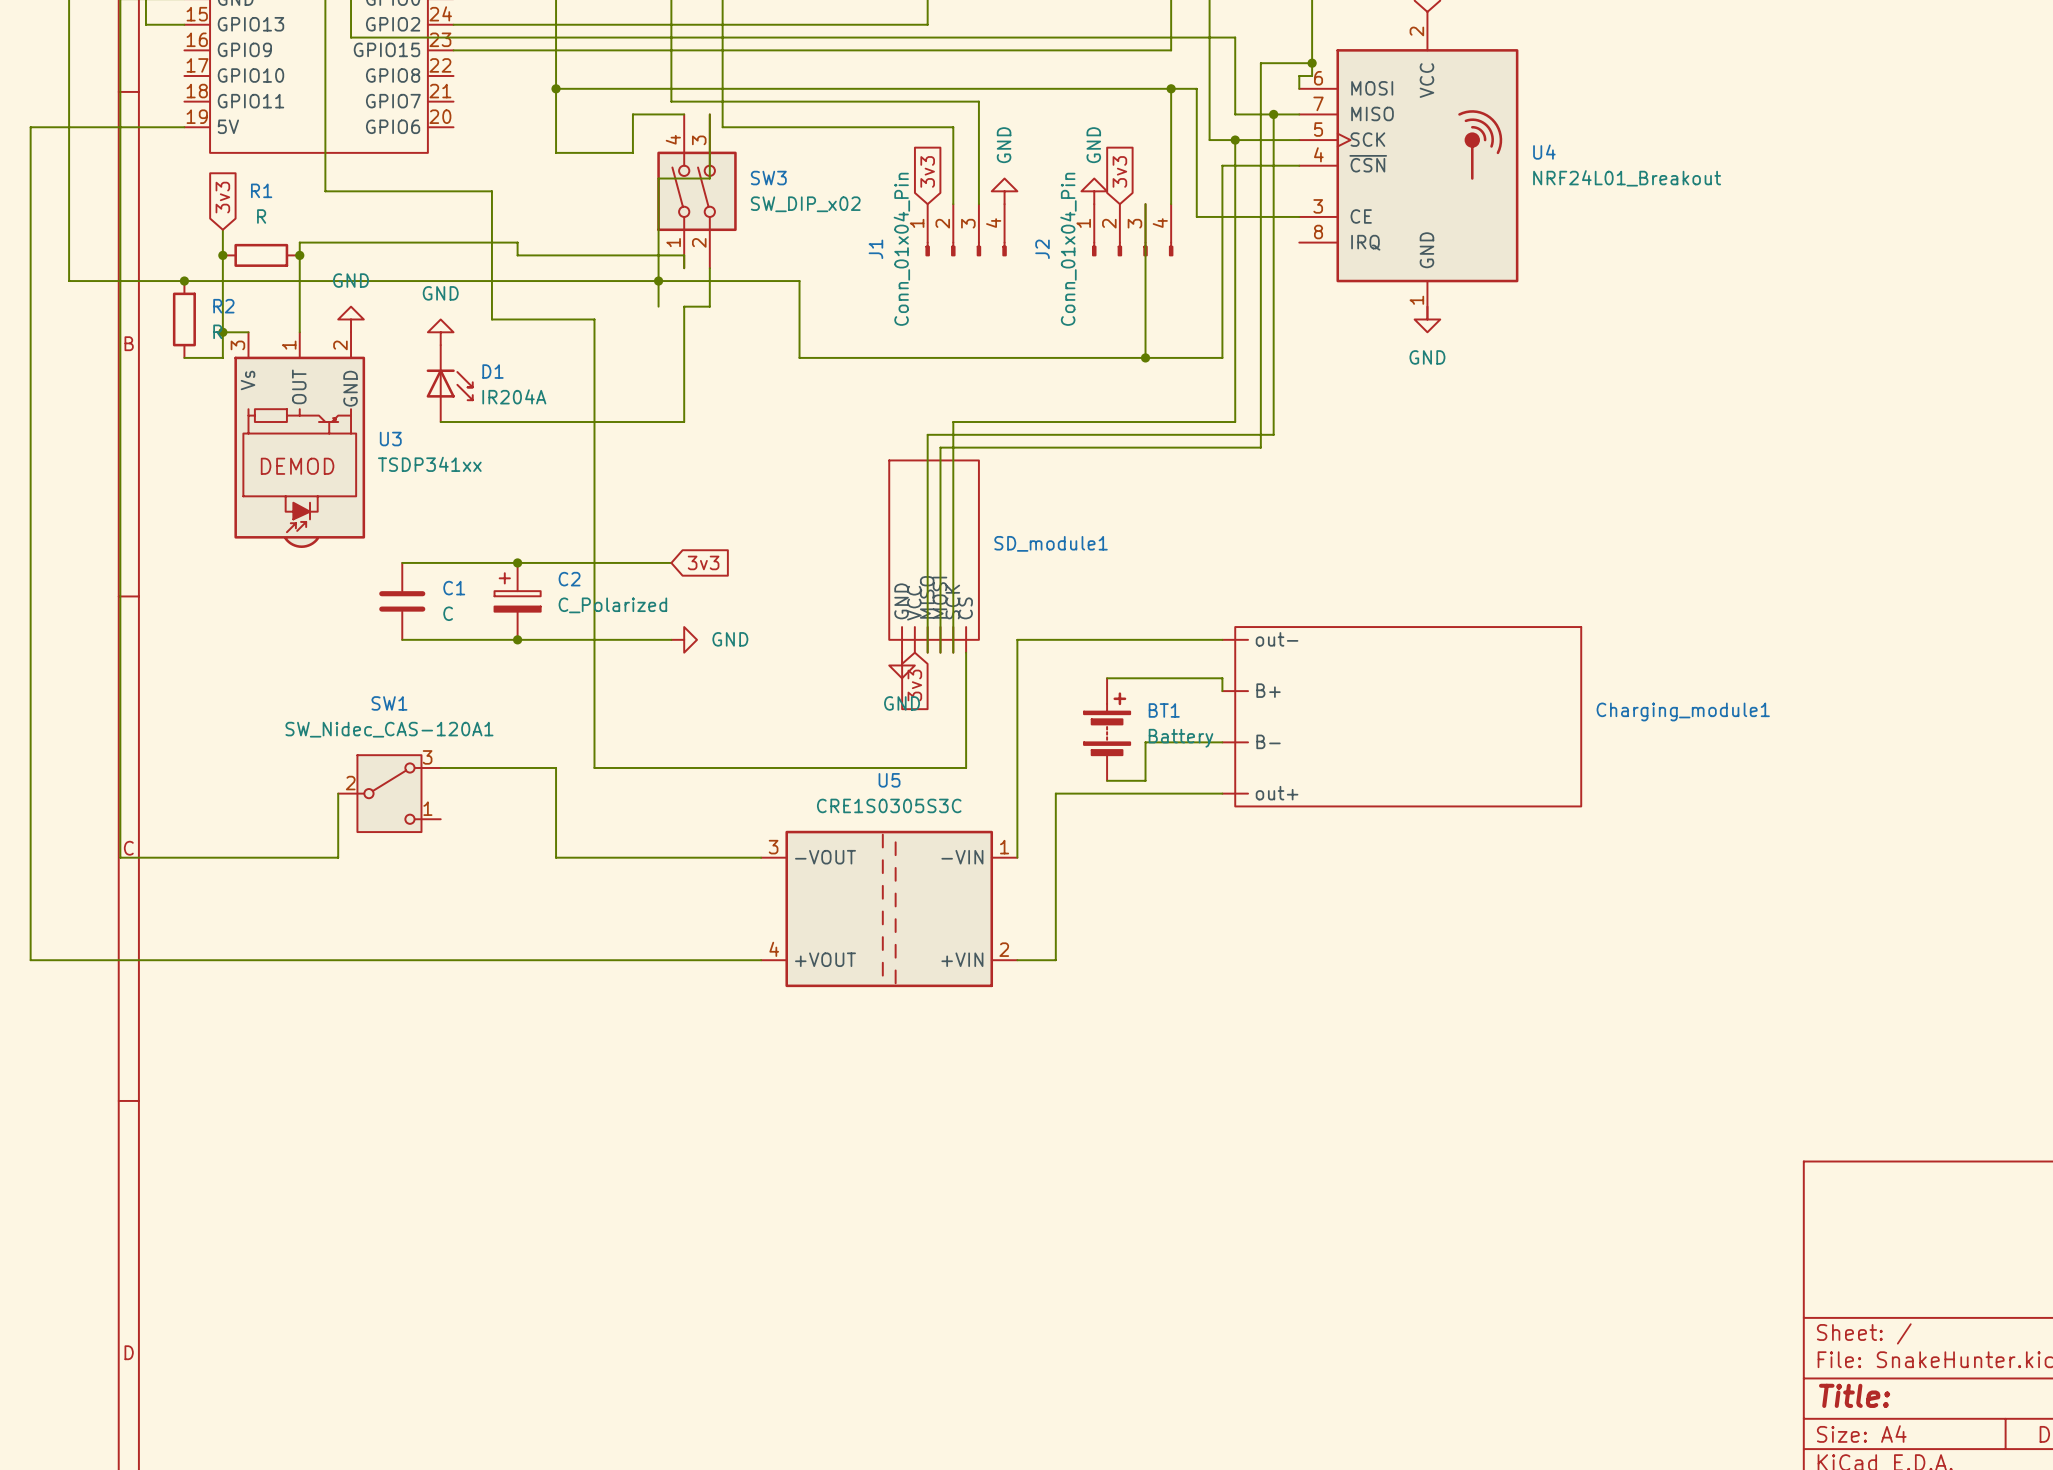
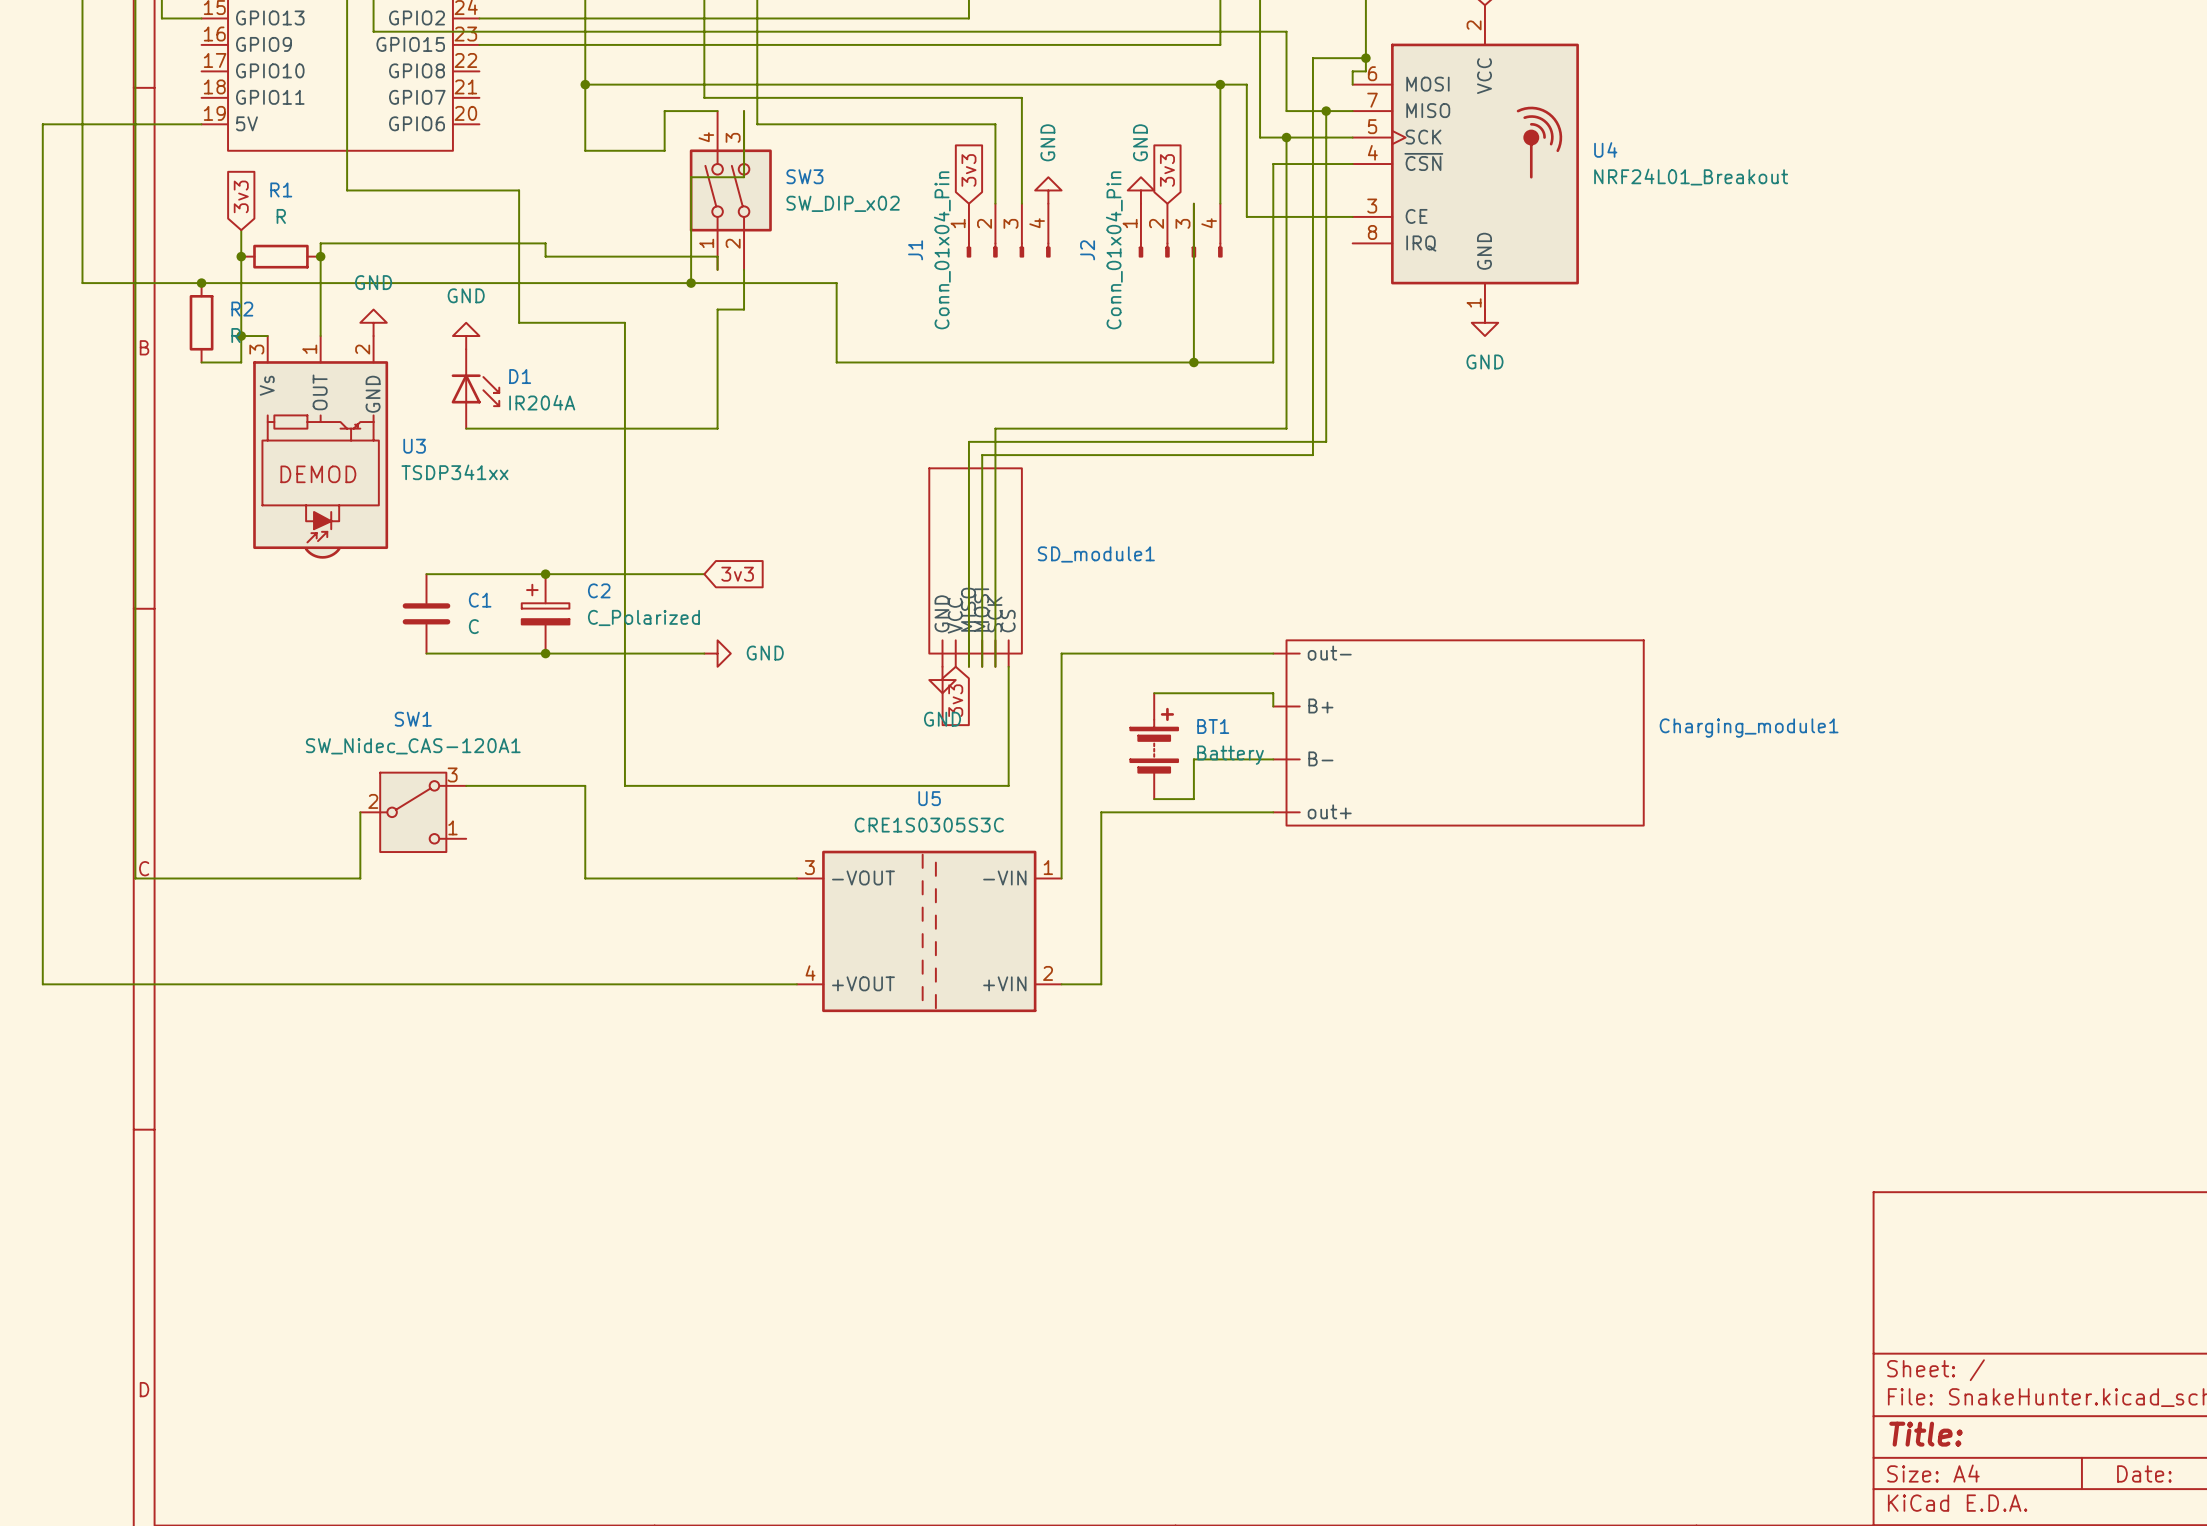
wire: (658, 281) (658, 306) -> none

